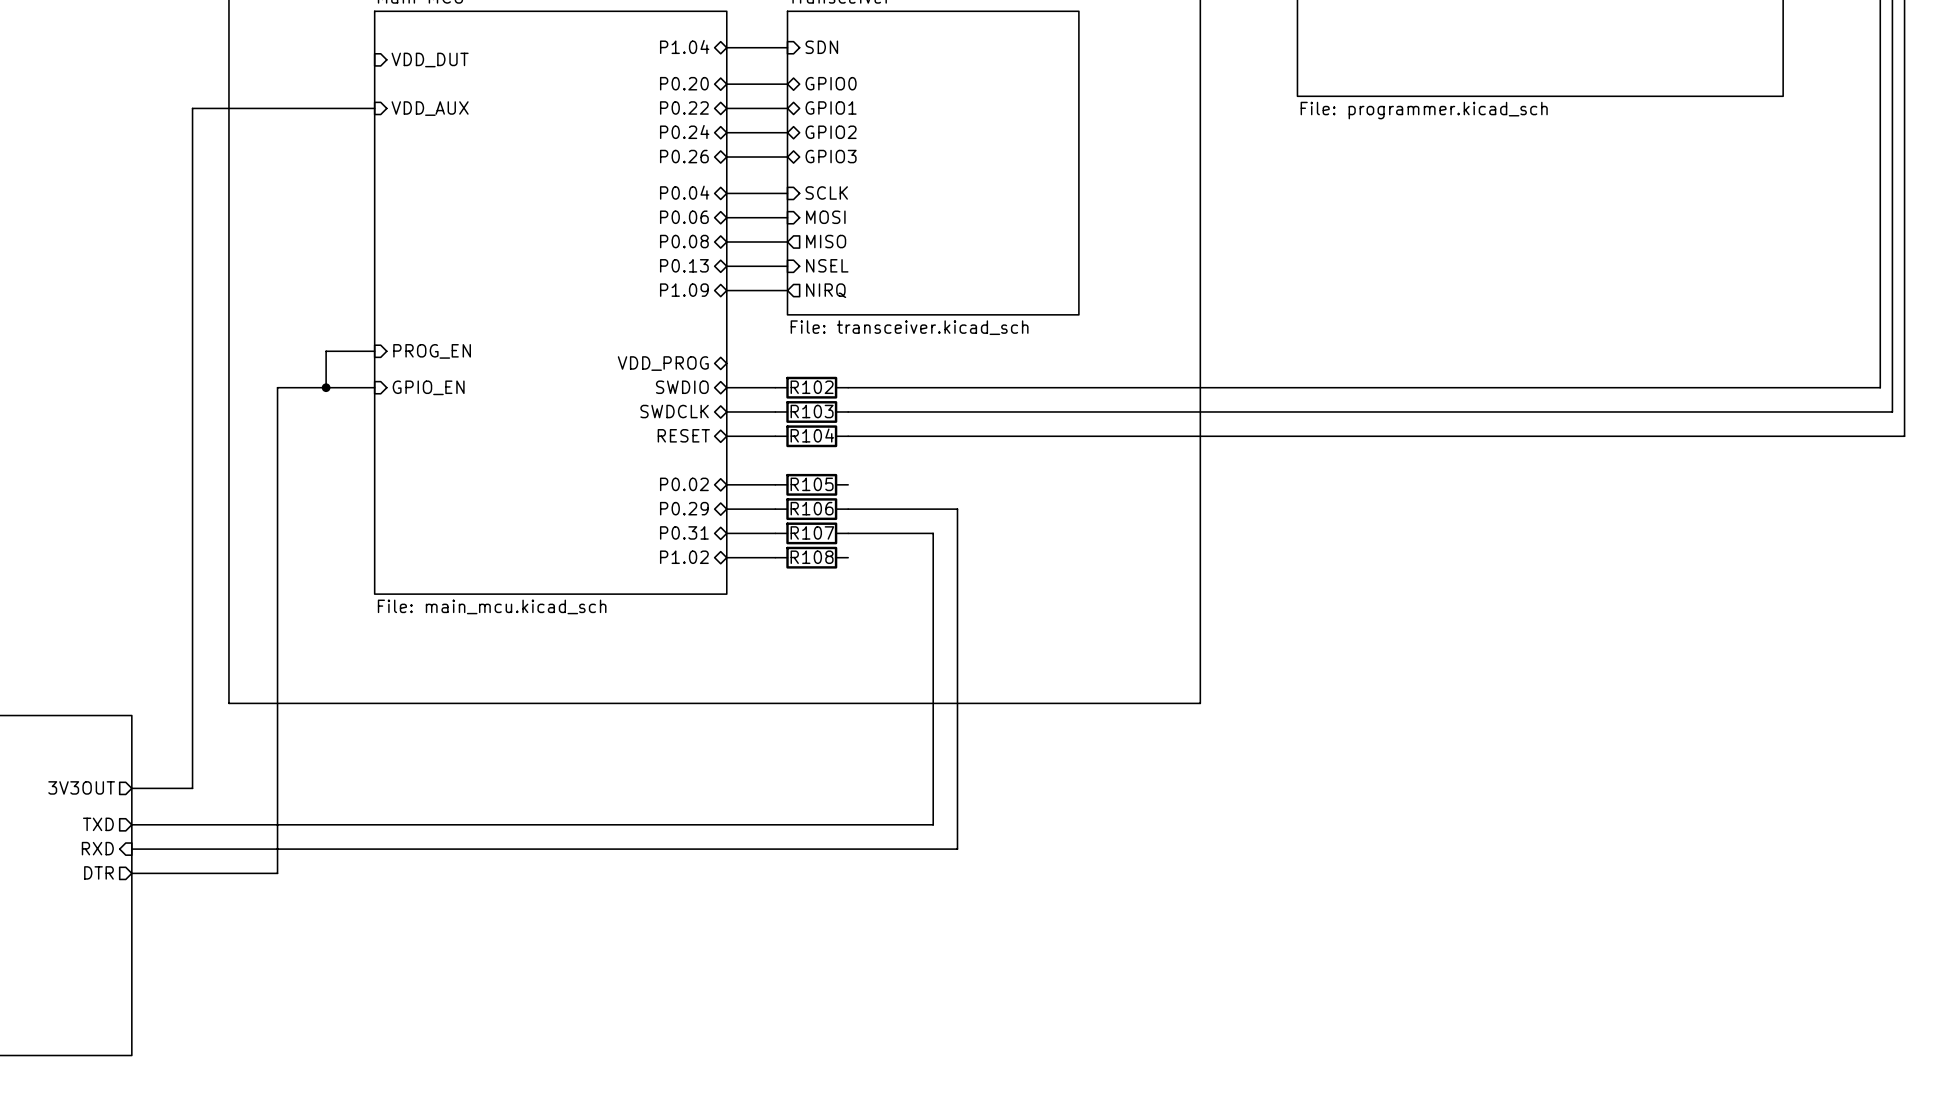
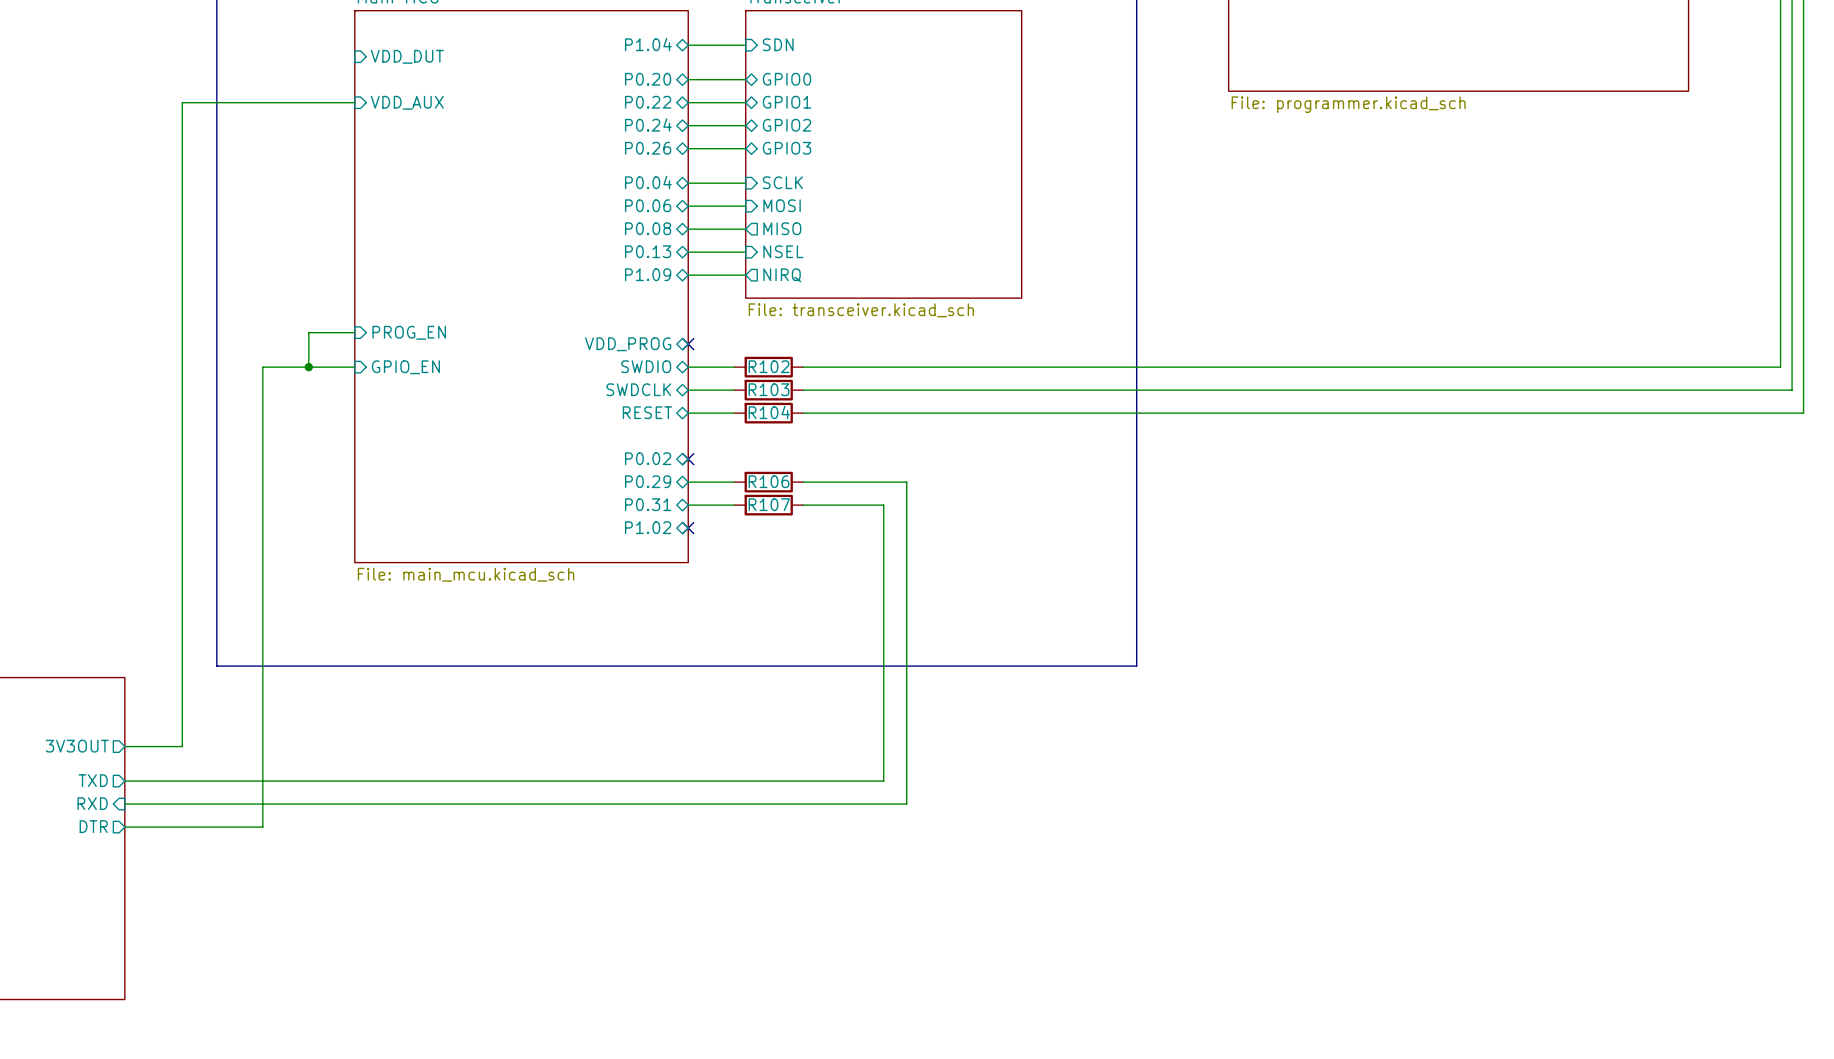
no-connect mark: none -> (688, 344)
wire: (726, 484) (775, 484) -> none
no-connect mark: none -> (688, 459)
R105: (811, 484) -> none
wire: (726, 557) (775, 557) -> none
no-connect mark: none -> (688, 528)
R108: (811, 557) -> none

